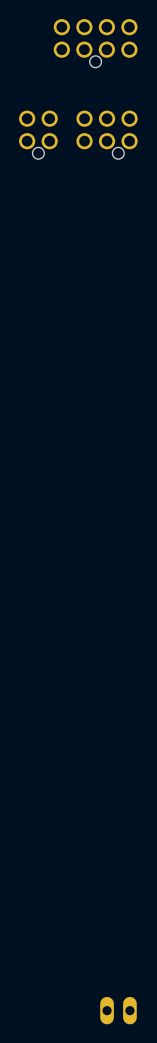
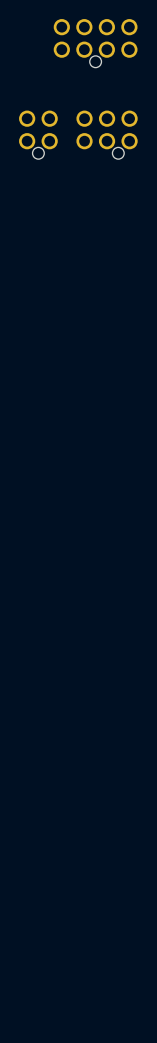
part: (118, 1010) -> none

